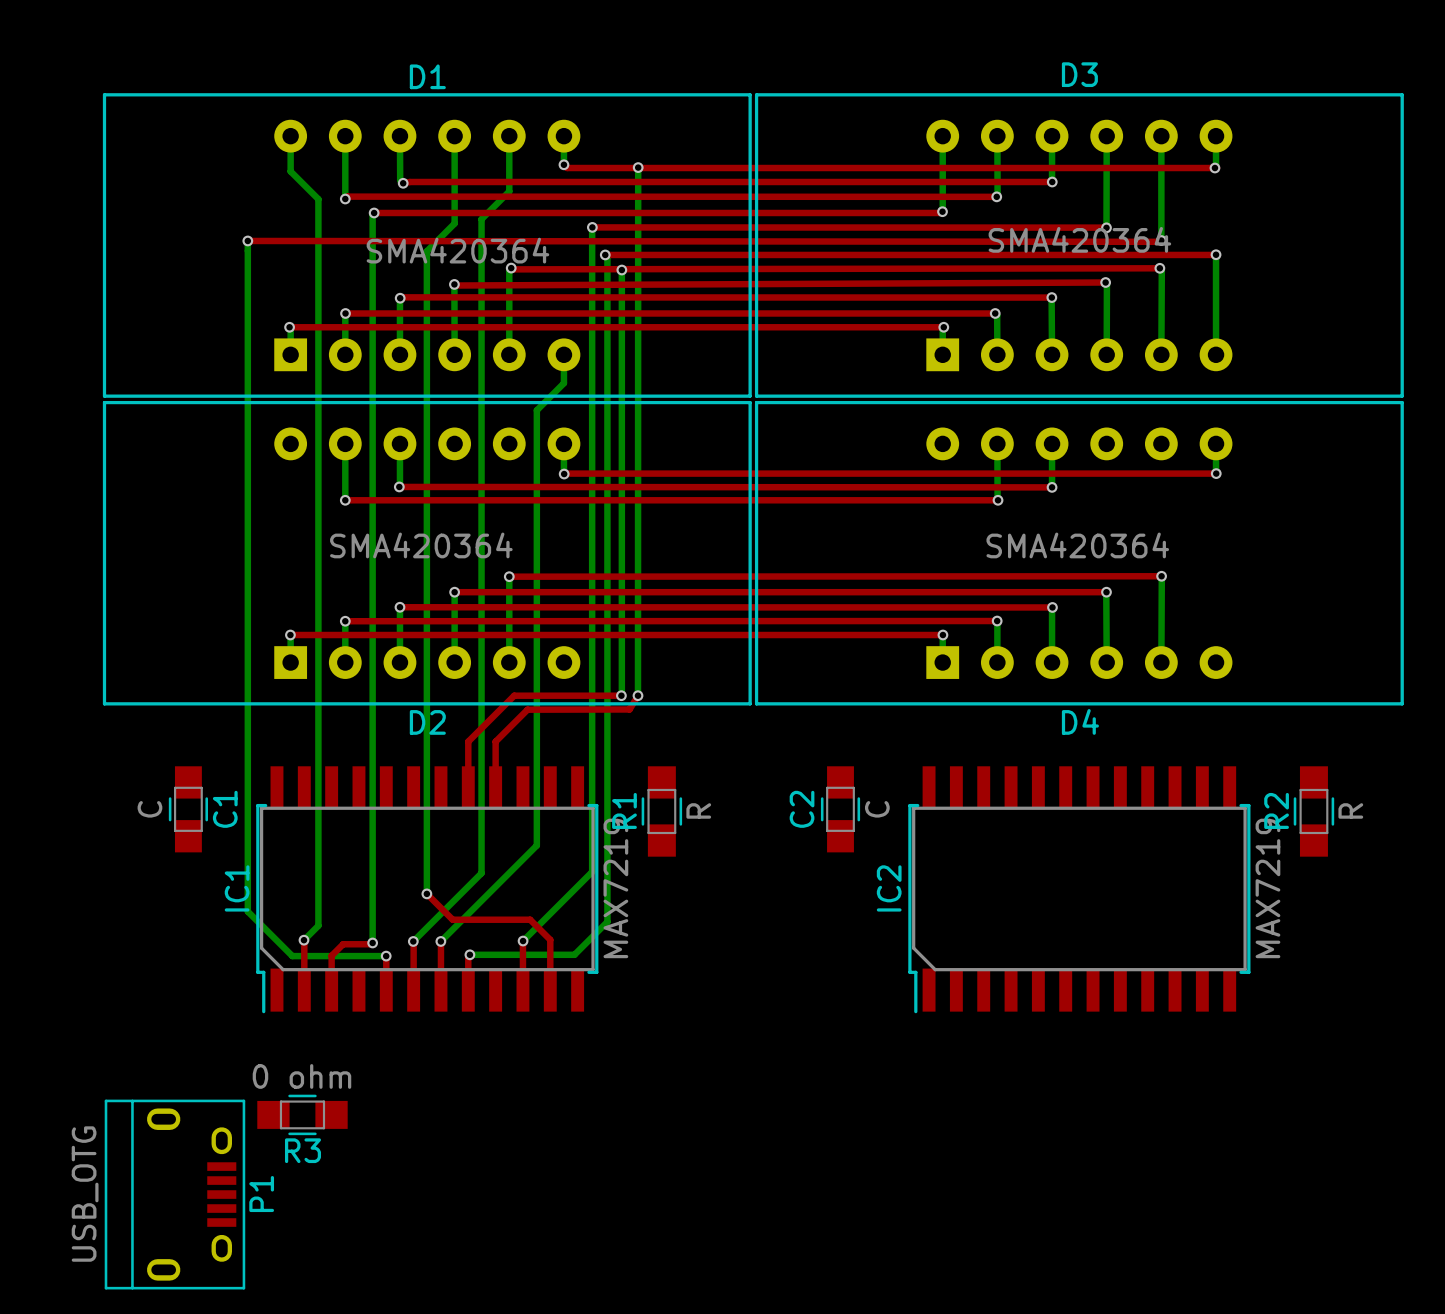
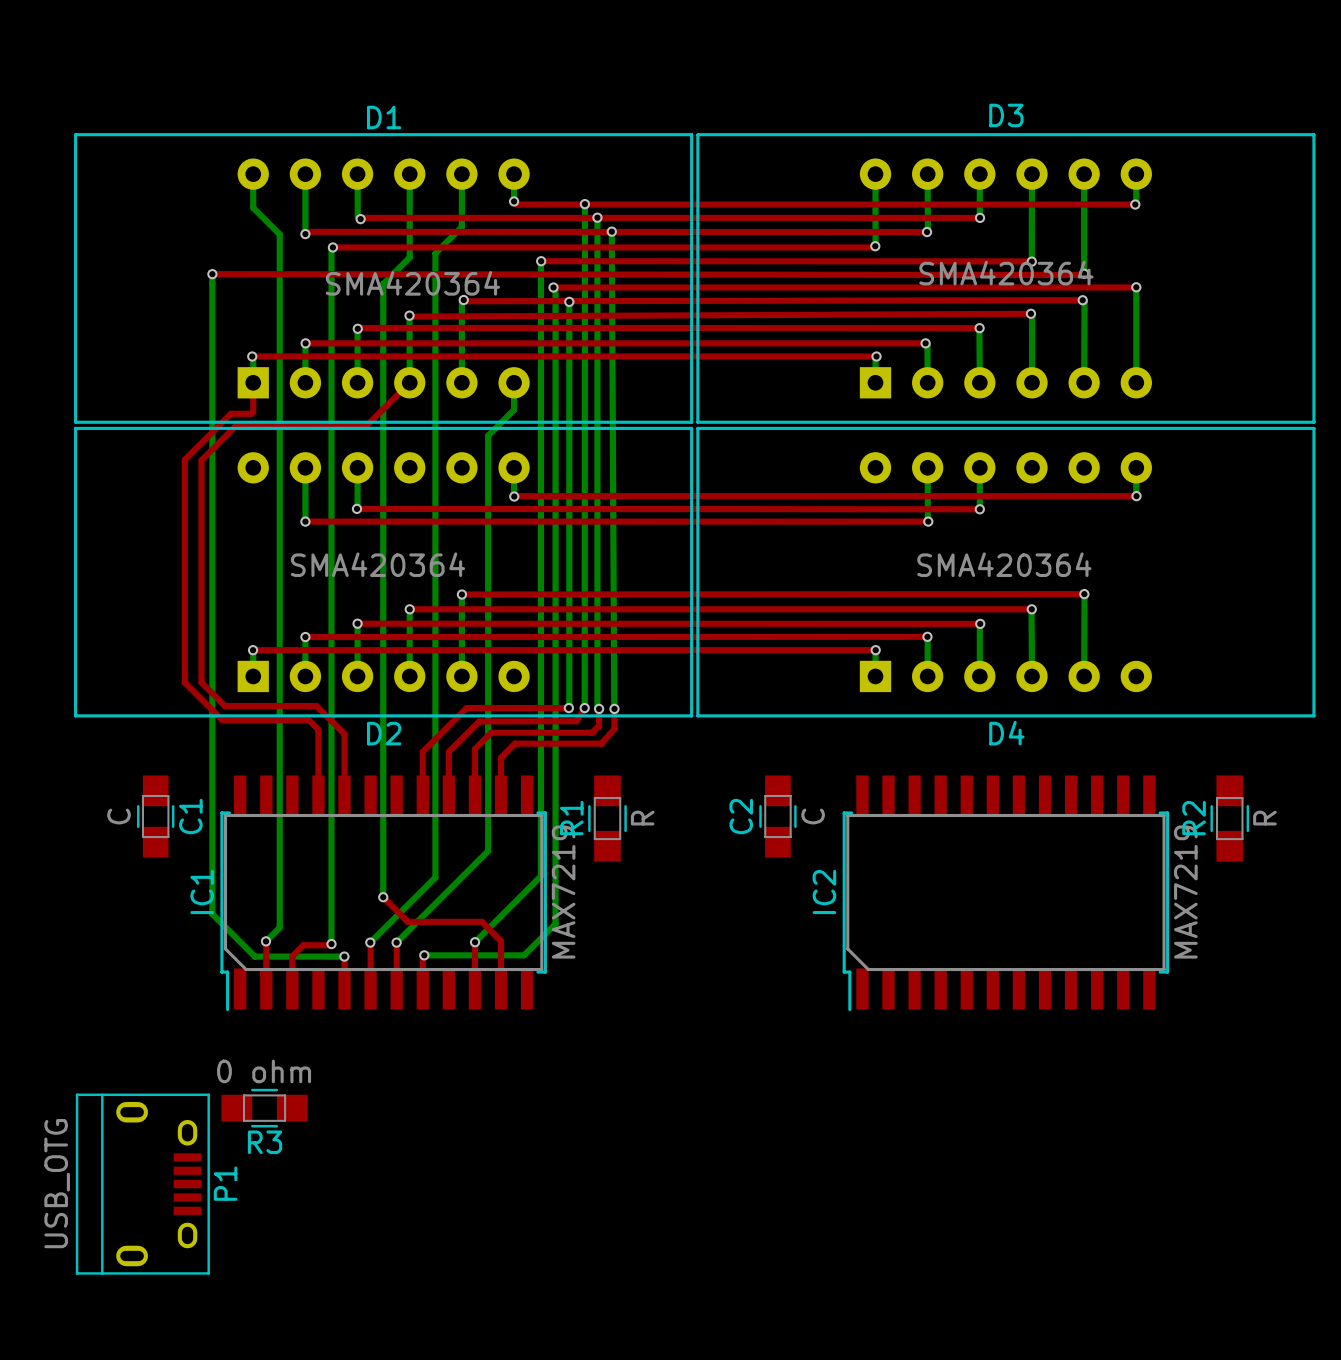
bottom track: none -> (597, 217) (597, 707) (599, 708)
via: none -> (597, 217)
bottom track: none -> (611, 231) (614, 708)
via: none -> (611, 231)
top track: none -> (253, 382) (253, 411) (250, 413) (230, 413) (184, 459) (184, 682) (222, 720) (308, 720) (318, 729) (318, 795)
top track: none -> (409, 382) (365, 426) (235, 426) (201, 460) (201, 682) (224, 706) (316, 706) (344, 734) (344, 795)
top track: none -> (599, 708) (599, 725) (592, 732) (491, 732) (474, 749) (474, 795)
via: none -> (599, 708)
top track: none -> (614, 708) (614, 728) (601, 743) (515, 743) (501, 757) (501, 795)
via: none -> (614, 708)

